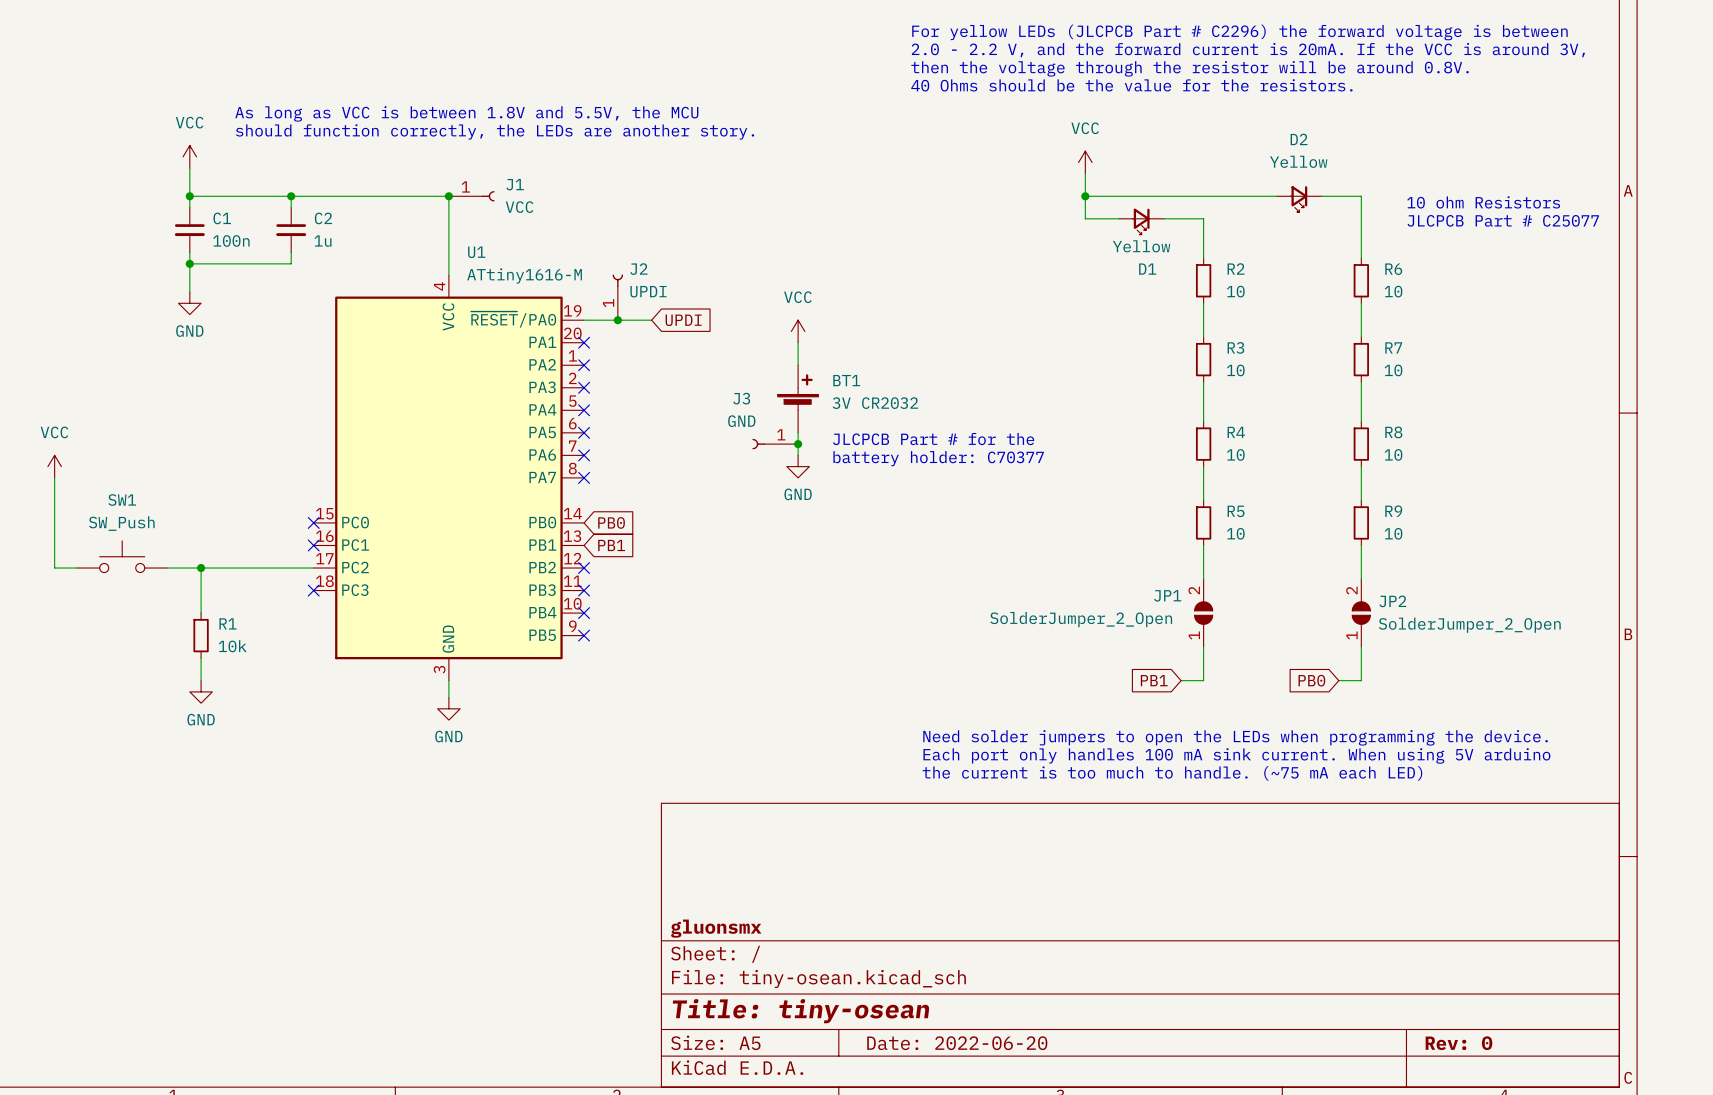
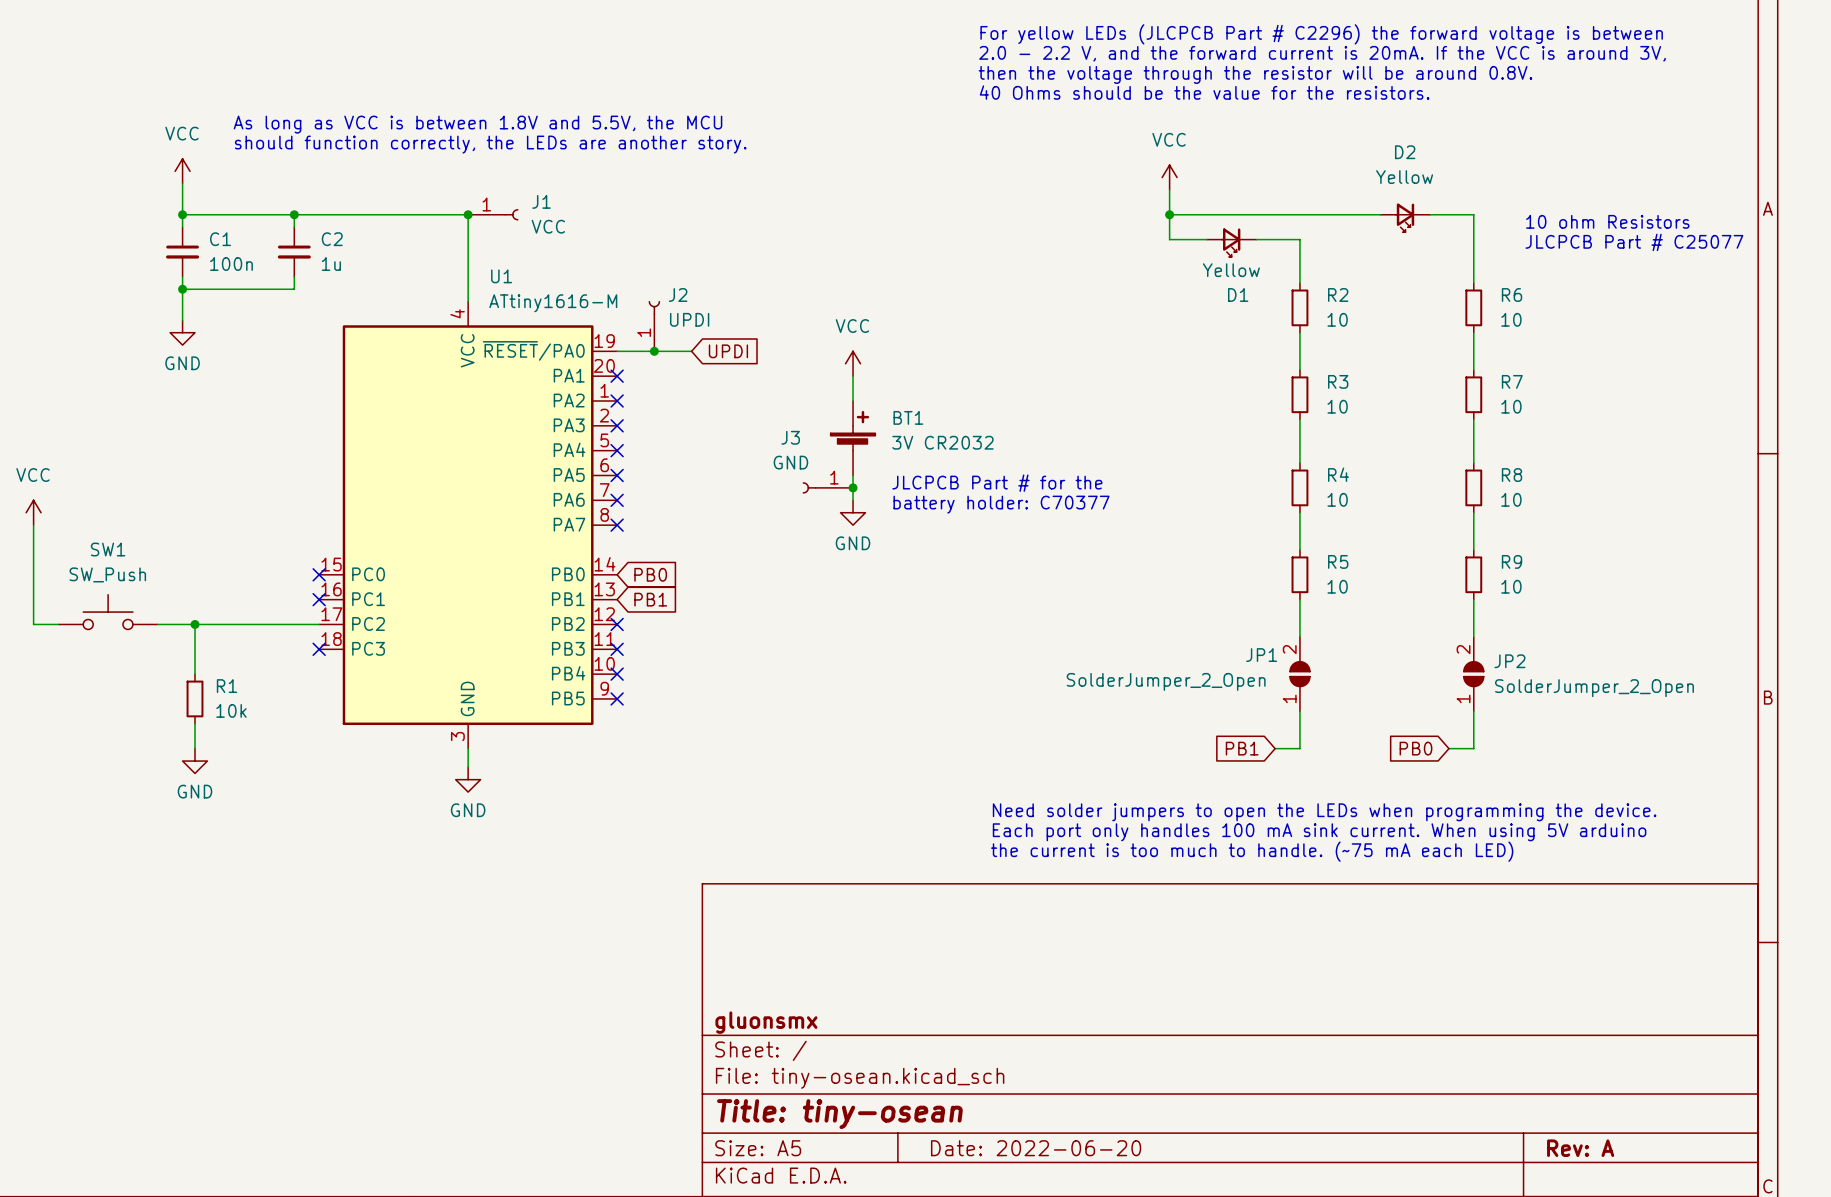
title block: Rev: 0 (1458, 1043) -> Rev: A (1580, 1148)

